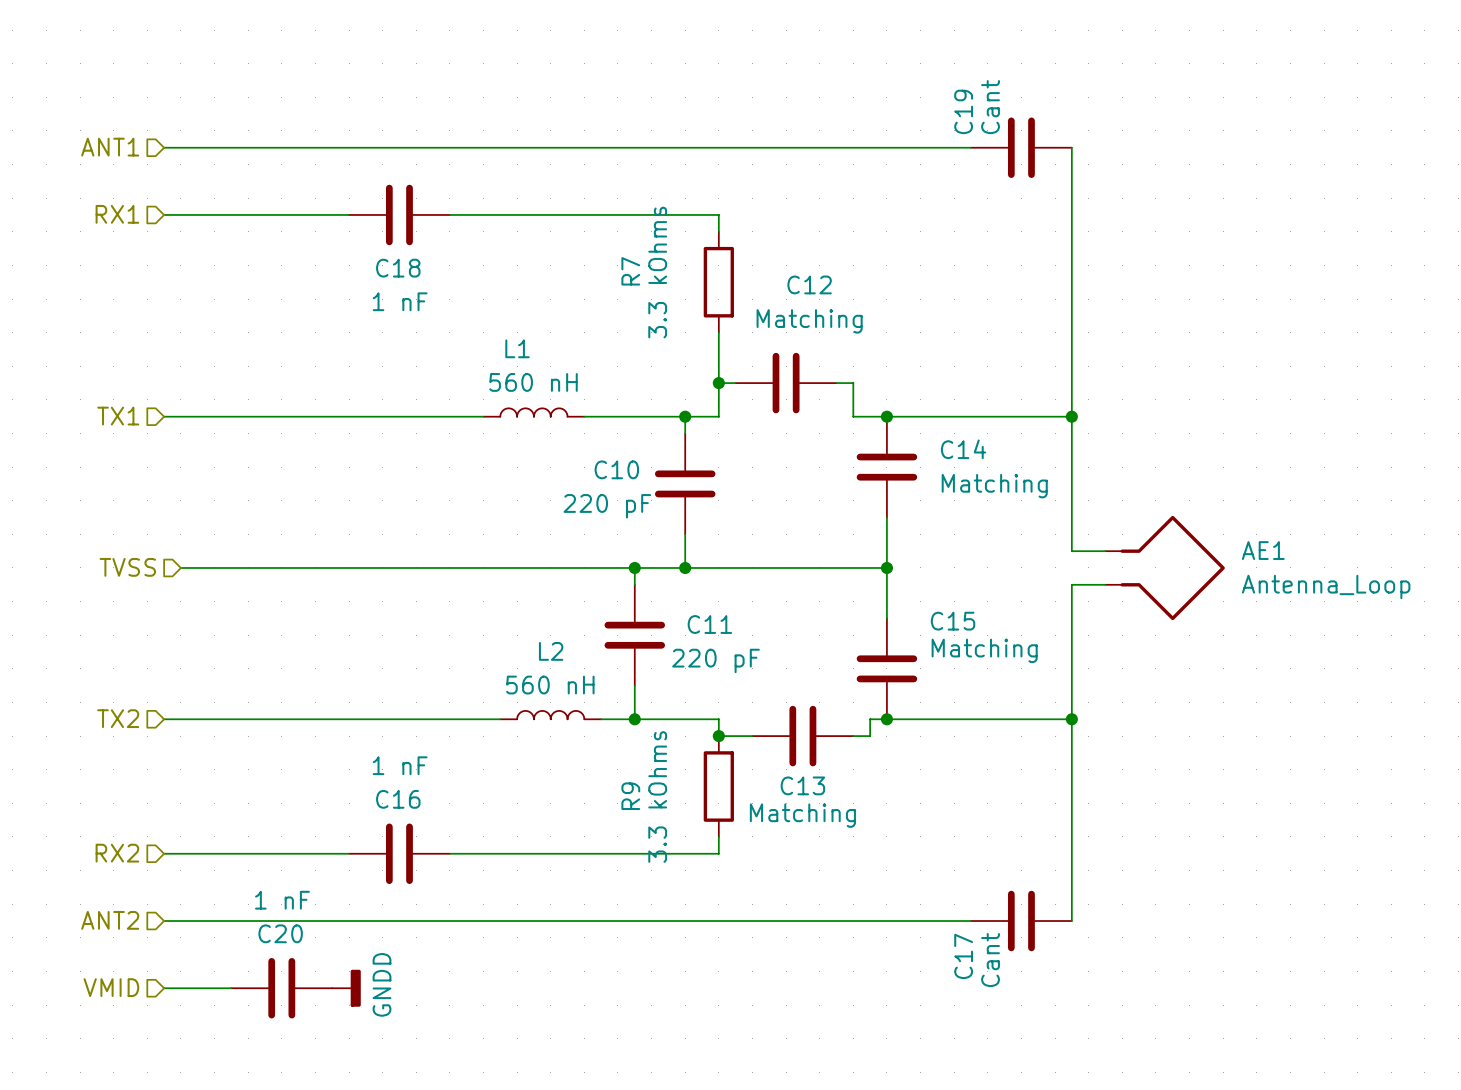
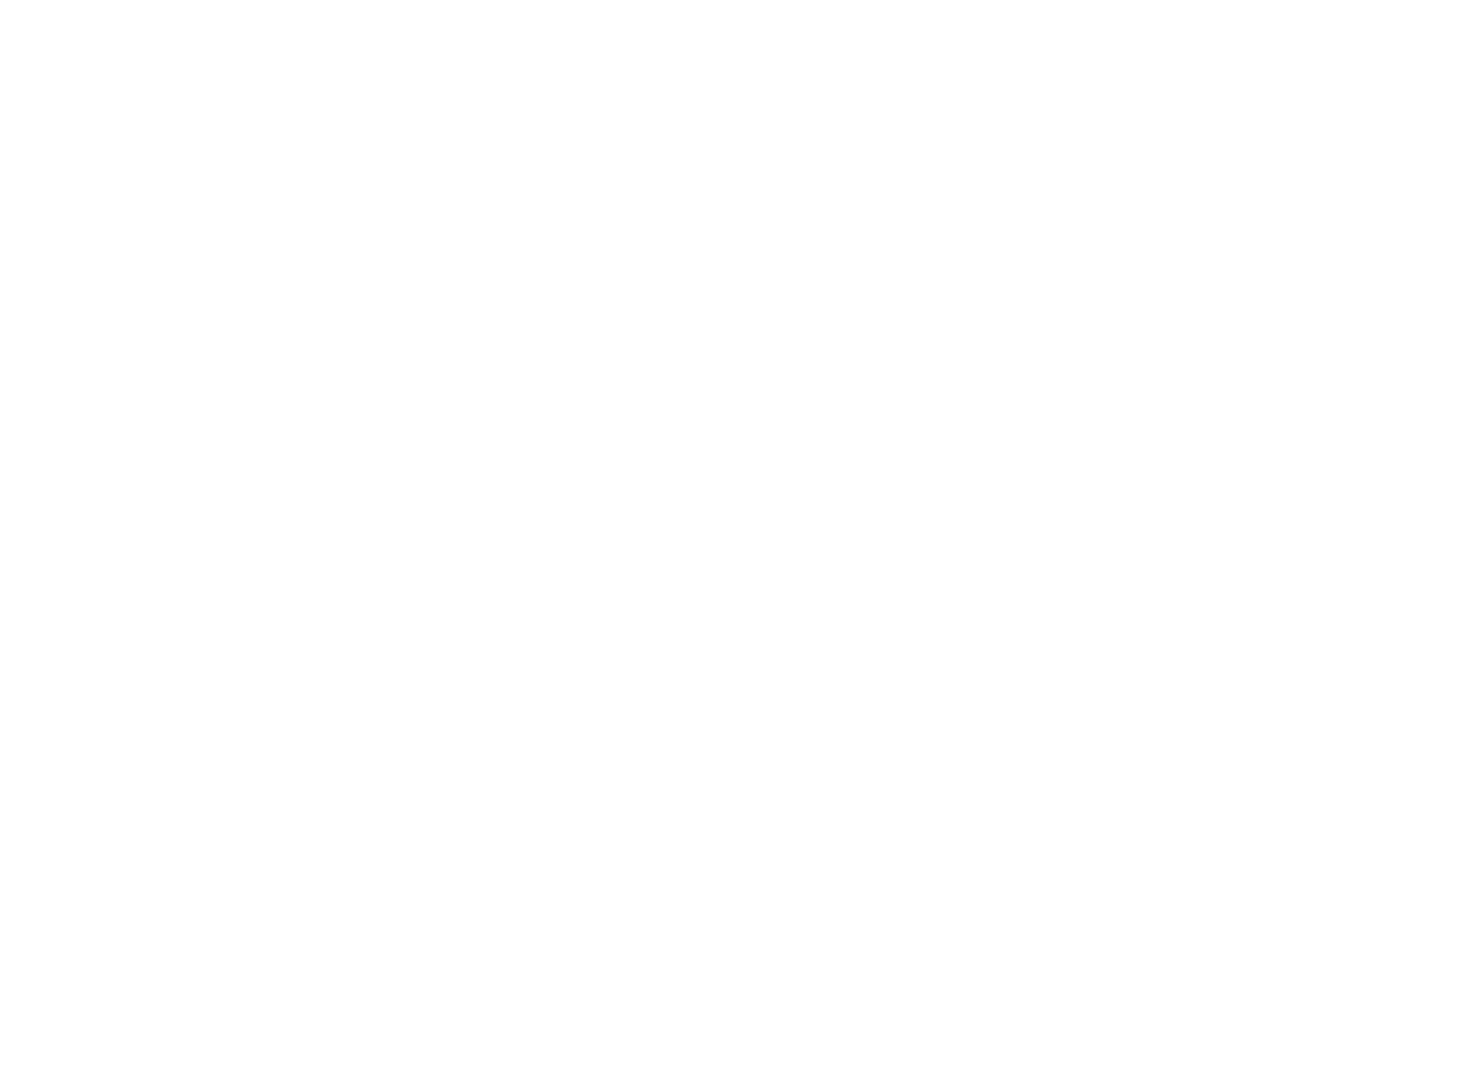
hierarchical label: ANT1 (110, 147) -> none
wire: (164, 147) (970, 147) -> none
C19: Cant (1021, 147) -> none
wire: (1071, 147) (1071, 551) (1105, 551) -> none
hierarchical label: RX1 (117, 214) -> none
wire: (164, 214) (349, 214) -> none
C18: 1 nF (399, 214) -> none
wire: (449, 214) (718, 214) (718, 231) -> none
R7: 3.3 kOhms (718, 282) -> none
wire: (718, 332) (718, 416) (584, 416) -> none
wire: (718, 383) (735, 383) -> none
junction: (718, 383) -> none
C12: Matching (786, 383) -> none
wire: (836, 383) (853, 383) (853, 416) (1071, 416) -> none
L1: 560 nH (533, 412) -> none
hierarchical label: TX1 (118, 416) -> none
wire: (164, 416) (483, 416) -> none
wire: (685, 416) (685, 433) -> none
junction: (685, 416) -> none
junction: (886, 416) -> none
junction: (1071, 416) -> none
C14: Matching (886, 467) -> none
C10: 220 pF (685, 483) -> none
wire: (886, 517) (886, 618) -> none
wire: (685, 534) (685, 567) -> none
hierarchical label: TVSS (127, 567) -> none
wire: (180, 567) (886, 567) -> none
wire: (634, 567) (634, 584) -> none
junction: (634, 567) -> none
junction: (685, 567) -> none
junction: (886, 567) -> none
AE1: Antenna_Loop (1165, 567) -> none
wire: (1105, 584) (1071, 584) (1071, 921) -> none
C11: 220 pF (634, 635) -> none
C15: Matching (886, 668) -> none
wire: (634, 685) (634, 719) -> none
L2: 560 nH (550, 715) -> none
hierarchical label: TX2 (118, 718) -> none
wire: (164, 719) (500, 719) -> none
wire: (601, 719) (718, 719) (718, 736) (752, 736) -> none
junction: (634, 719) -> none
junction: (886, 719) -> none
wire: (1071, 719) (870, 719) (870, 736) (853, 736) -> none
junction: (1071, 719) -> none
junction: (718, 736) -> none
C13: Matching (802, 736) -> none
R9: 3.3 kOhms (718, 786) -> none
wire: (718, 836) (718, 853) (449, 853) -> none
hierarchical label: RX2 (117, 853) -> none
wire: (164, 853) (349, 853) -> none
C16: 1 nF (399, 853) -> none
hierarchical label: ANT2 (110, 920) -> none
wire: (164, 921) (970, 921) -> none
C17: Cant (1021, 921) -> none
hierarchical label: VMID (111, 987) -> none
wire: (164, 988) (231, 988) -> none
C20: 1 nF (281, 988) -> none
power symbol: GNDD (346, 988) -> none

